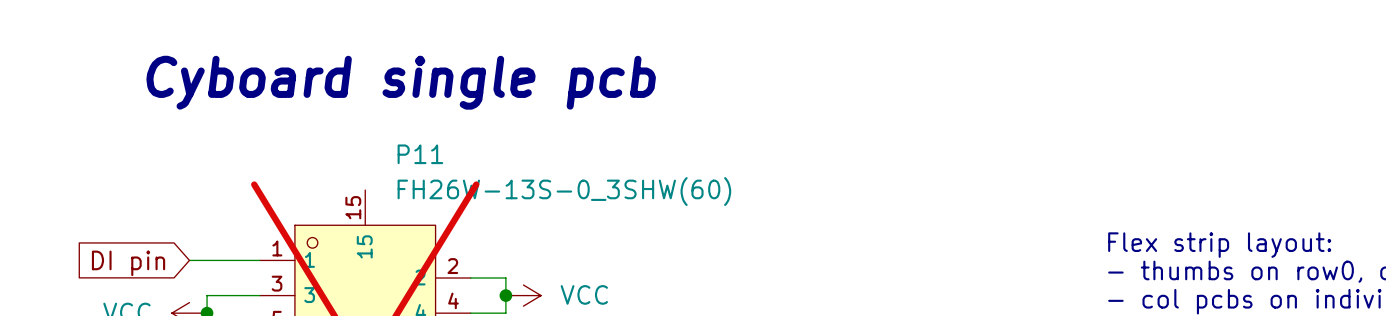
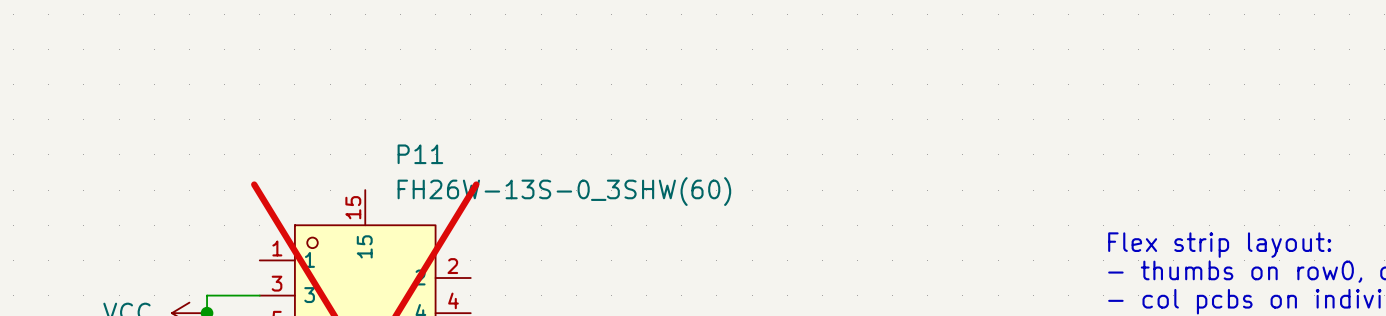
text: Cyboard single pcb (401, 82) -> none
wire: (189, 260) (259, 260) -> none
global label: DI pin (128, 263) -> none
wire: (470, 278) (505, 278) (505, 313) (470, 313) -> none
junction: (505, 295) -> none
power symbol: VCC (523, 295) -> none

